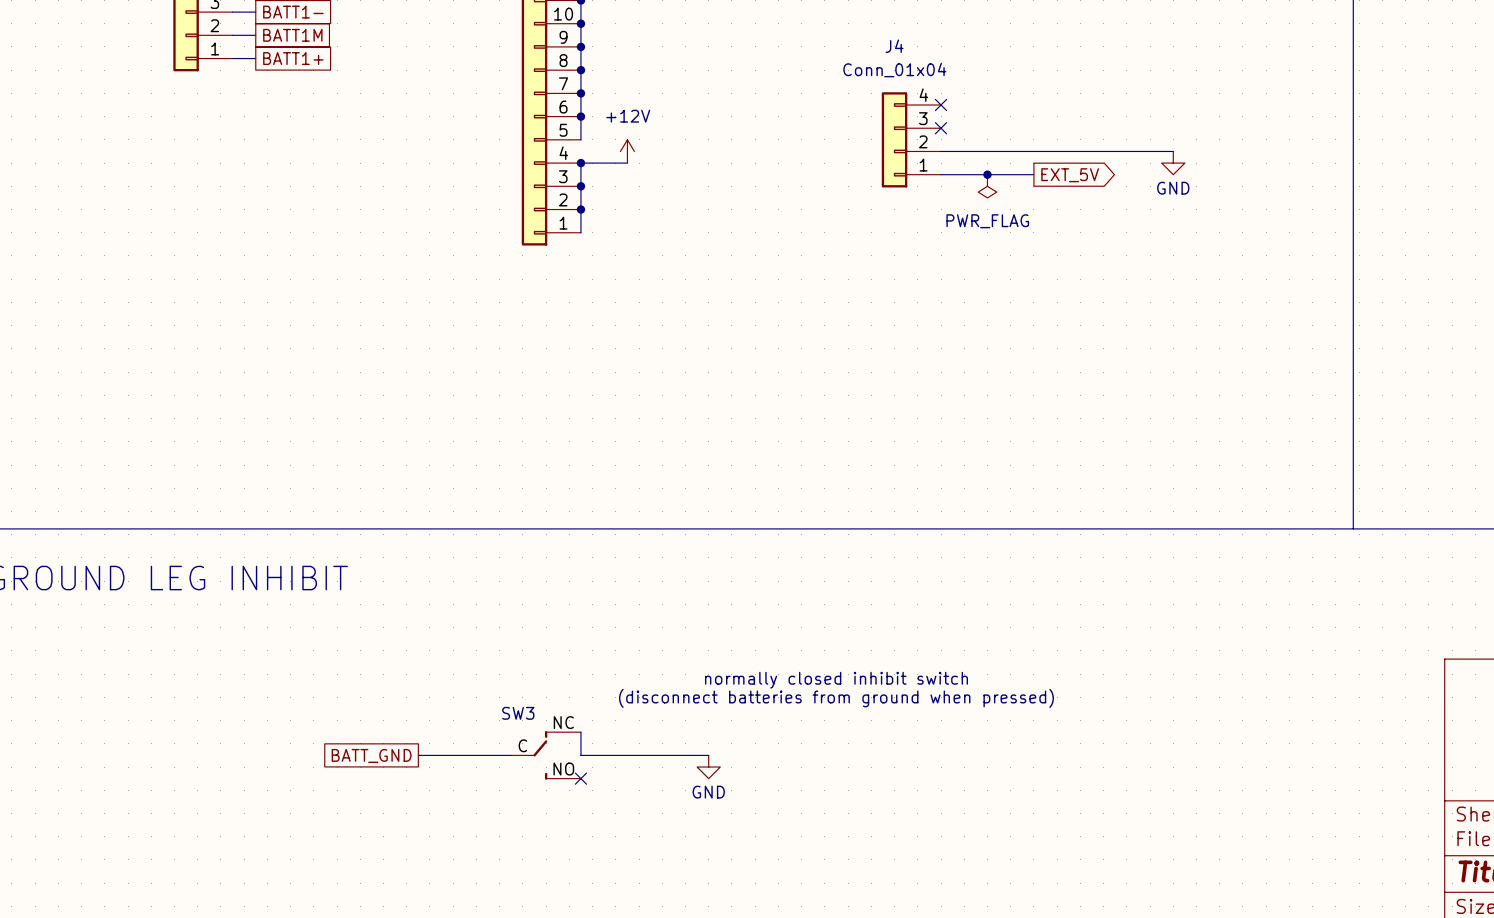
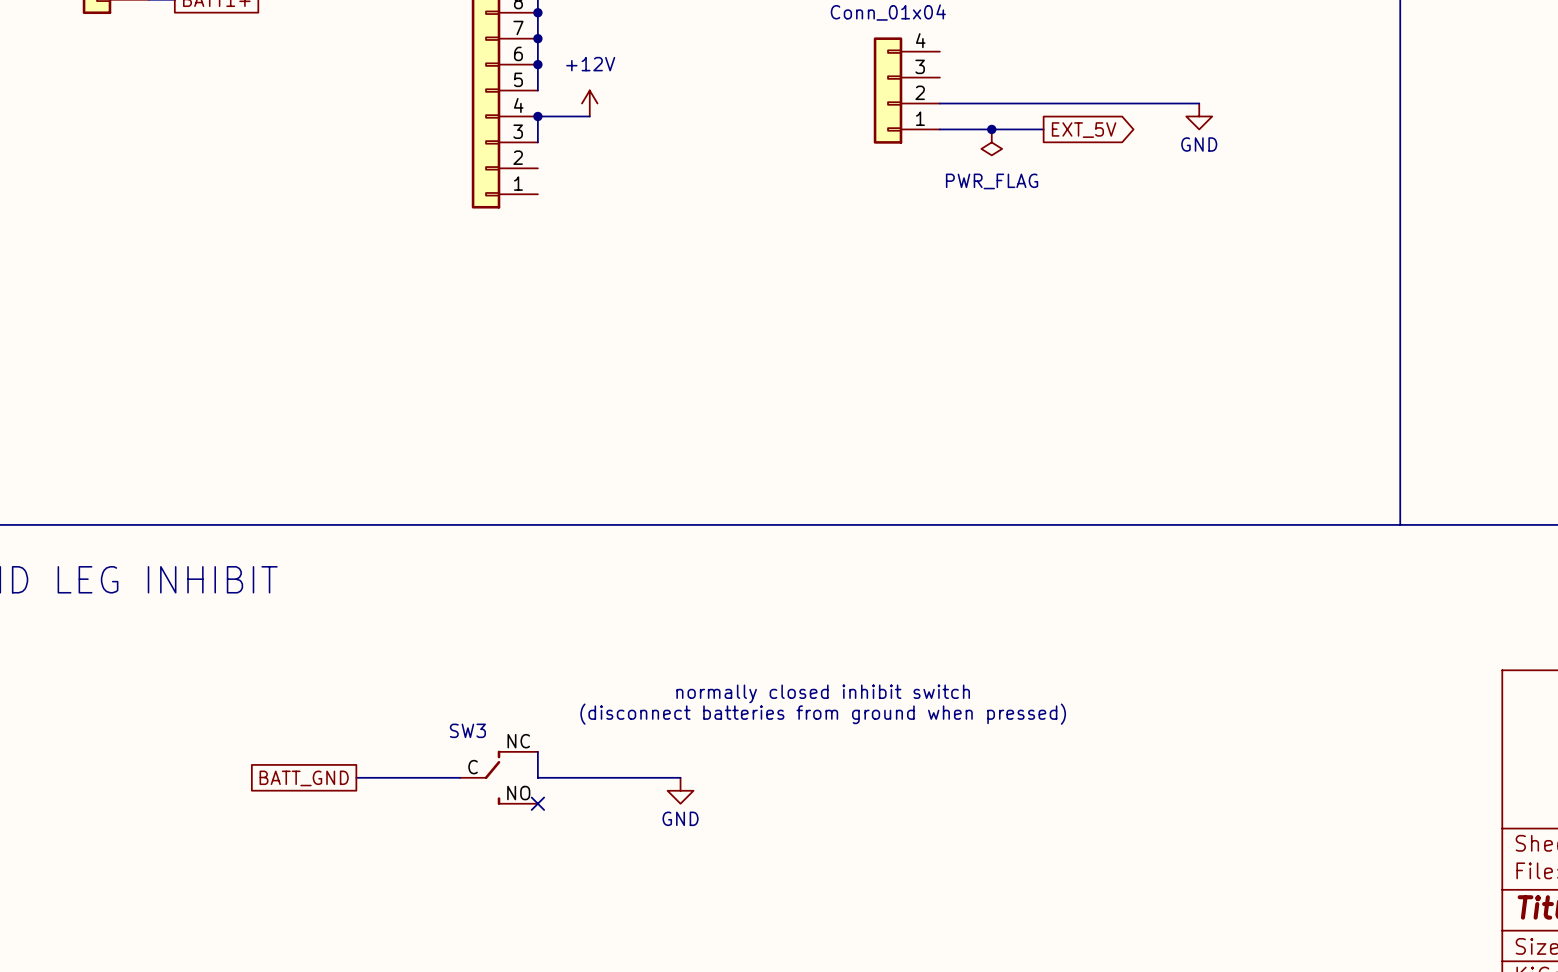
no-connect mark: (941, 105) -> none
no-connect mark: (941, 128) -> none
wire: (580, 186) (580, 232) -> none
junction: (580, 186) -> none
junction: (580, 209) -> none

